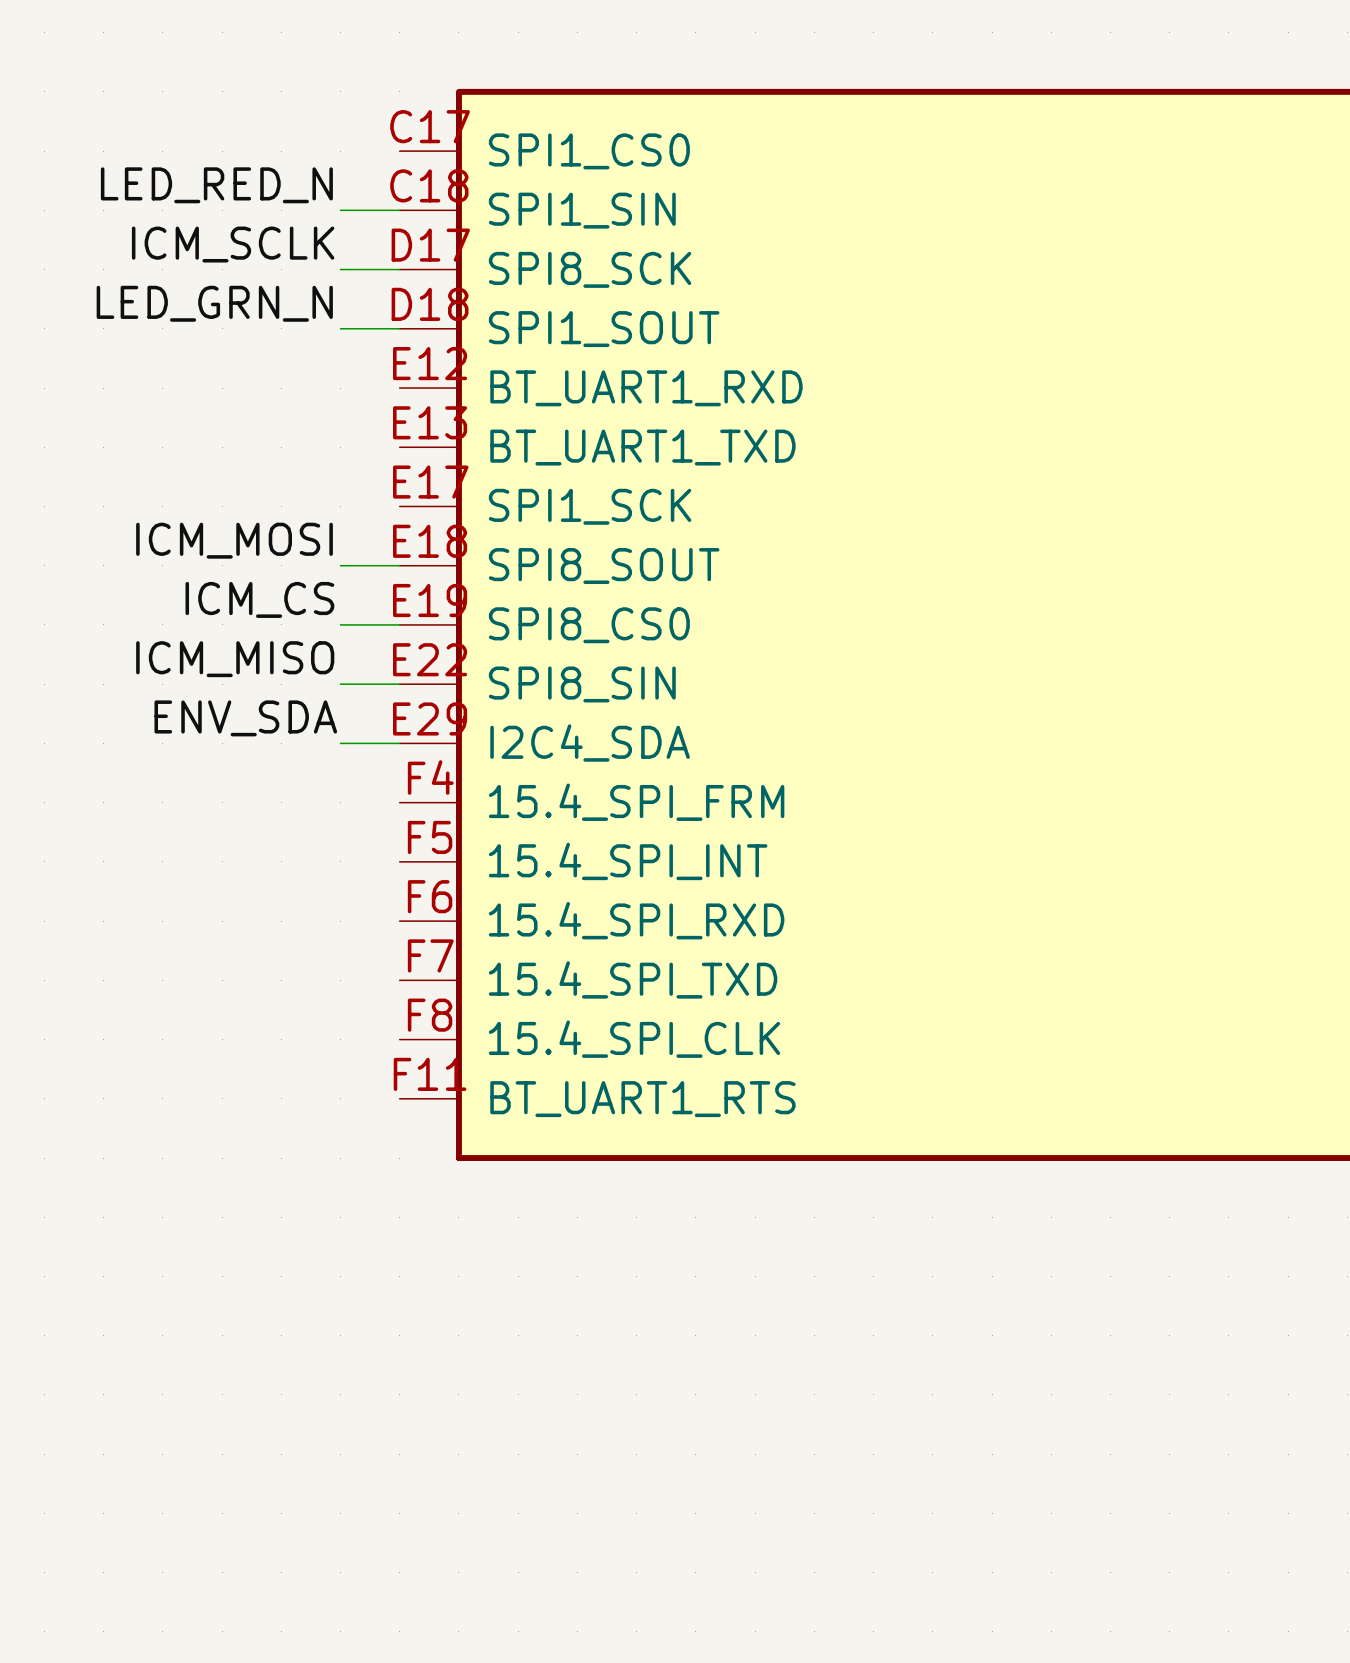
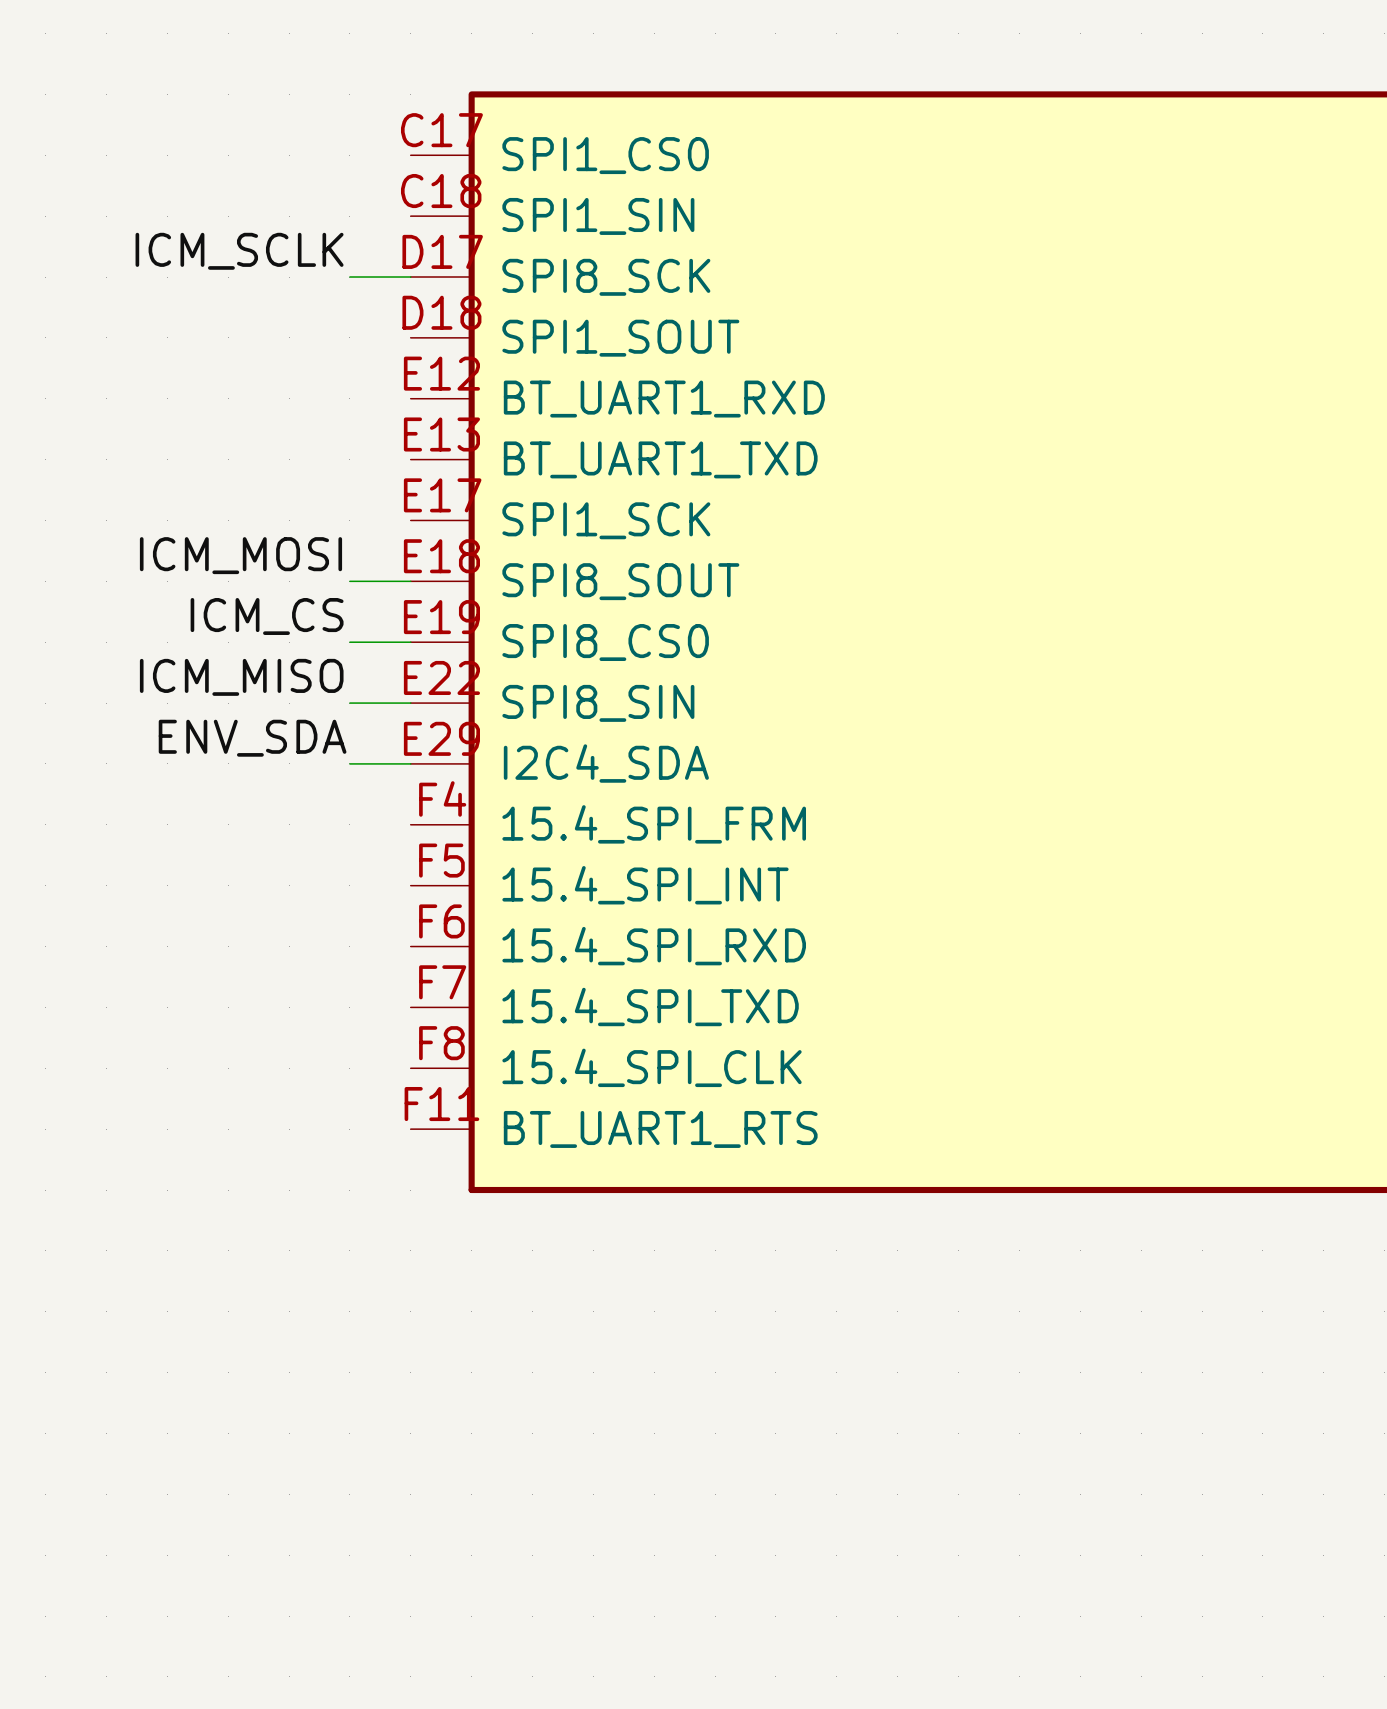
label: LED_RED_N (216, 185) -> none
wire: (340, 210) (399, 210) -> none
label: LED_GRN_N (214, 303) -> none
wire: (340, 328) (399, 328) -> none

